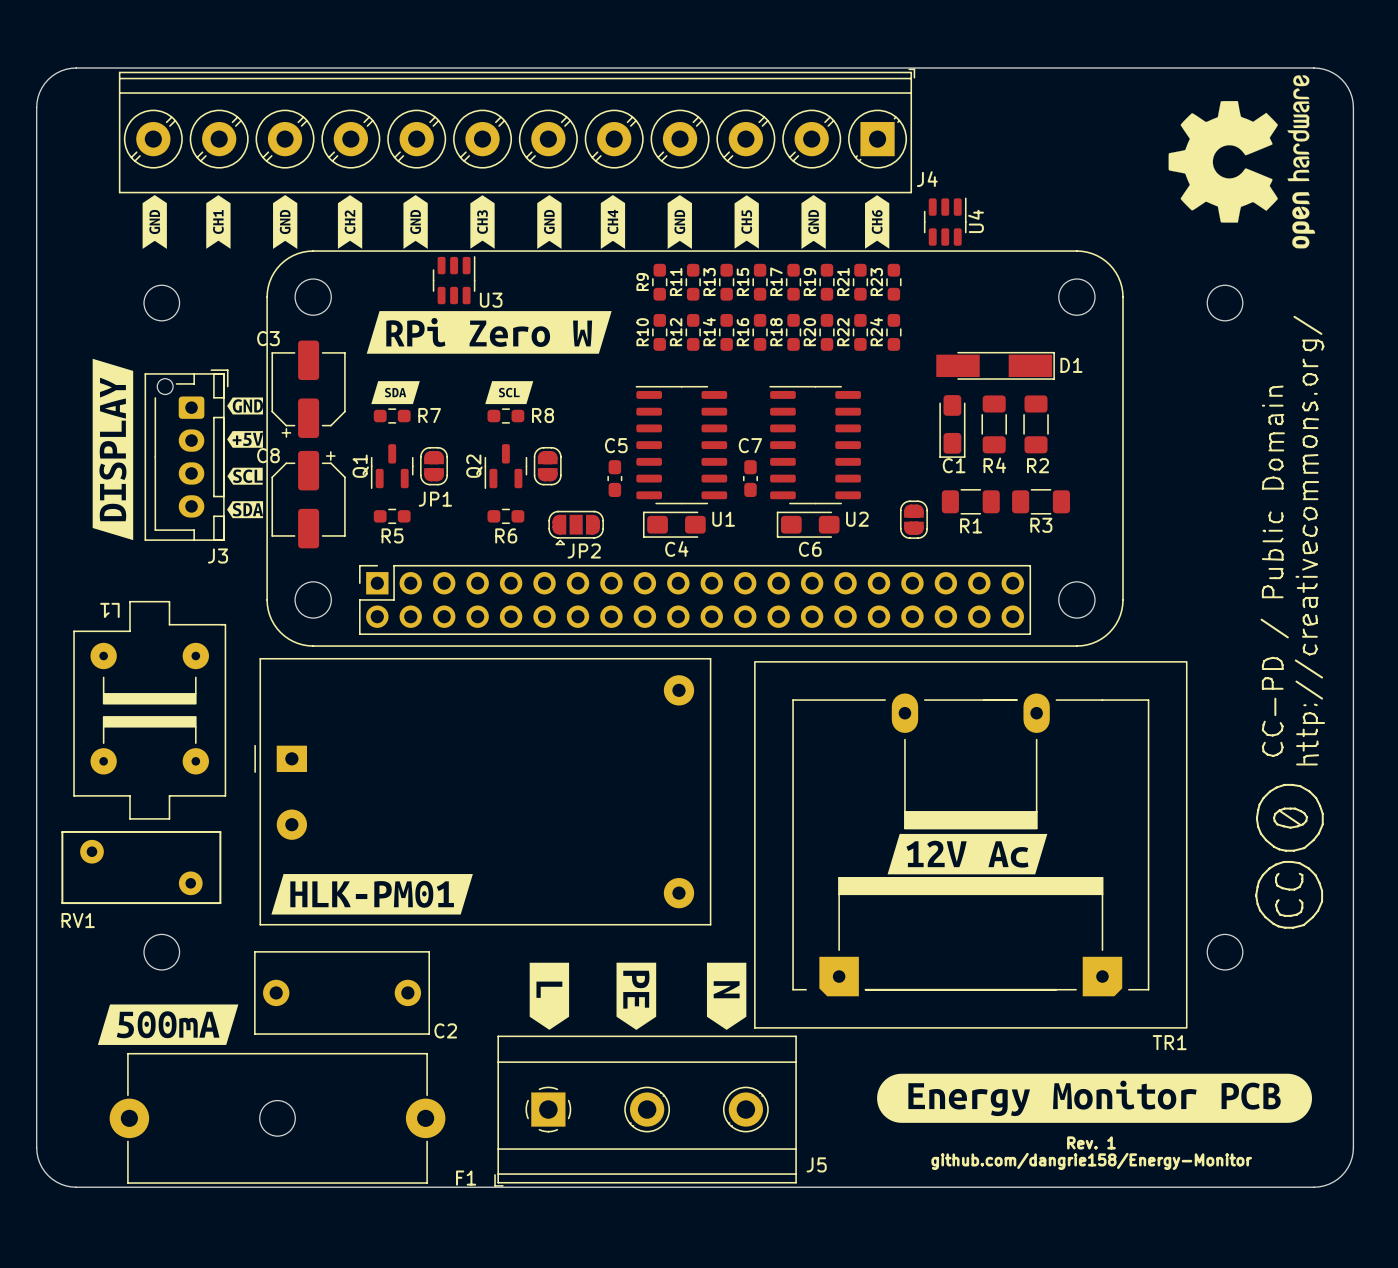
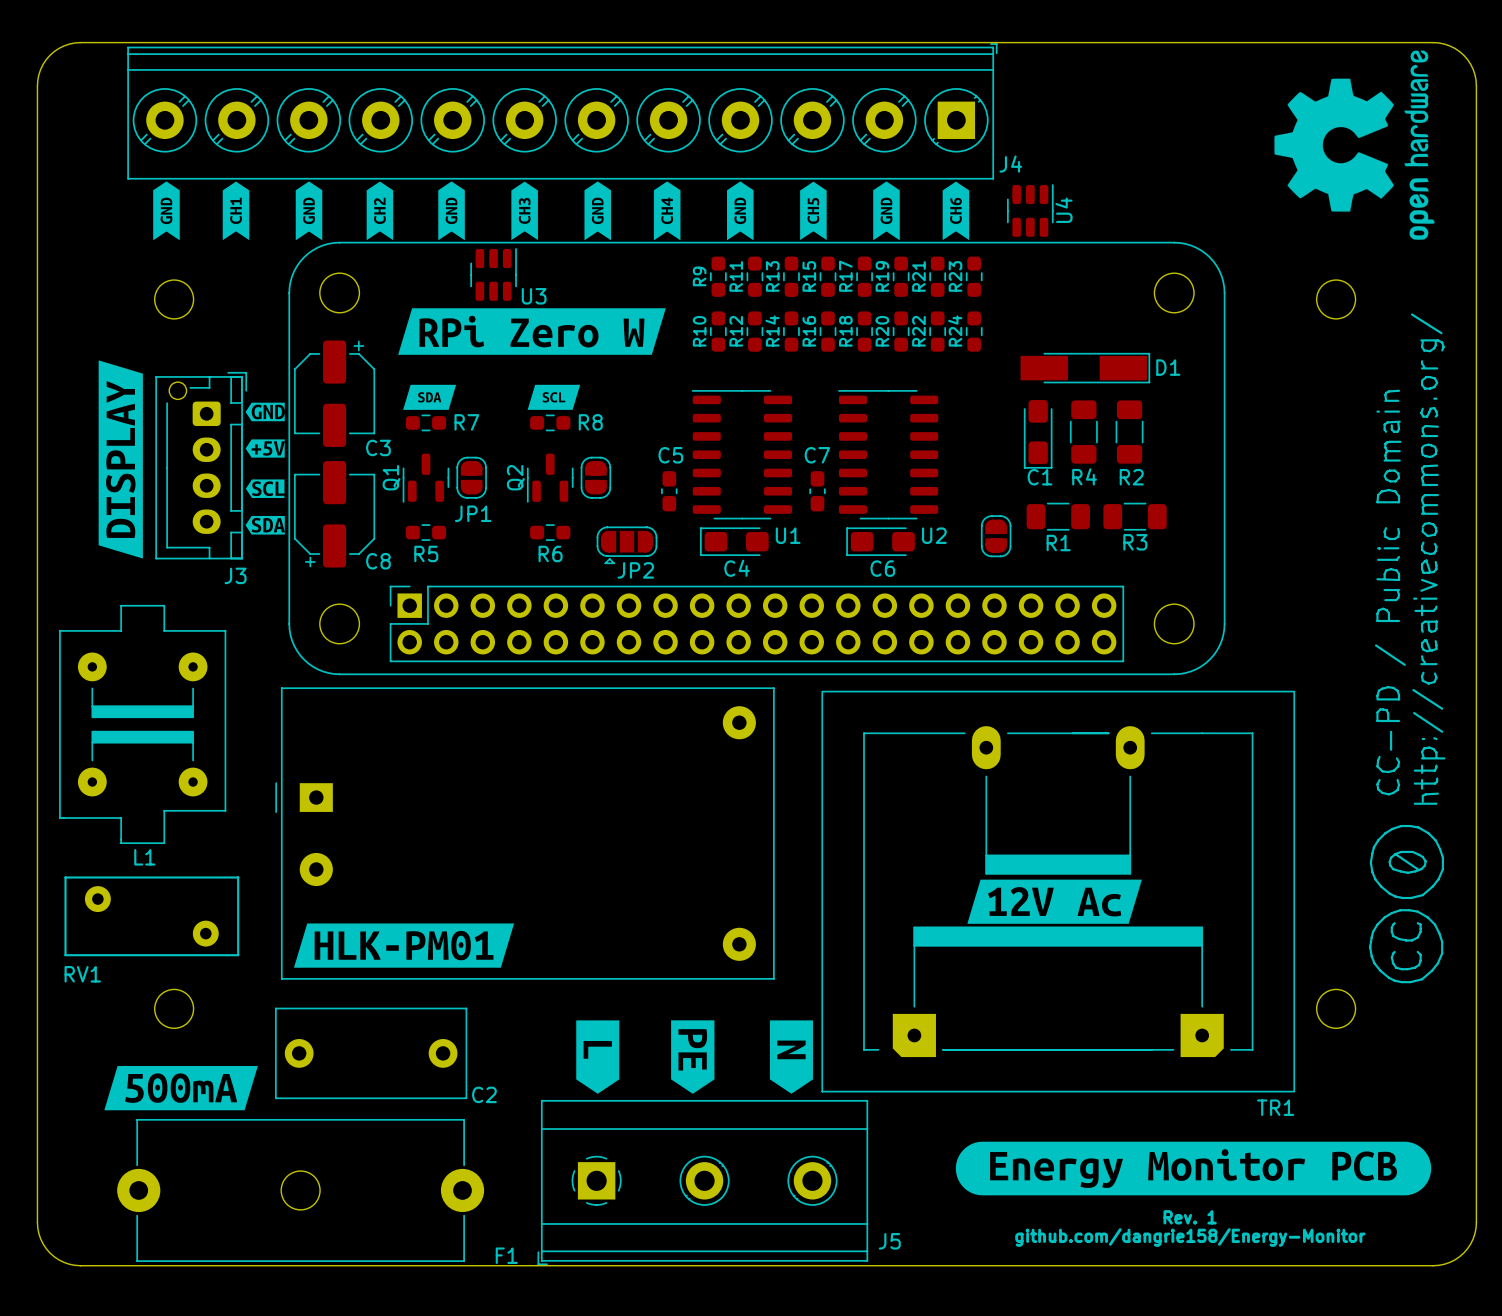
C3 rotation: 0° (308, 389) -> 180° (334, 393)
C8 rotation: 0° (308, 499) -> 180° (334, 514)
L1 footprint: [73, 600, 227, 820] -> [59, 604, 227, 845]
L1 name position: L1 (109, 610) -> L1 (144, 857)

